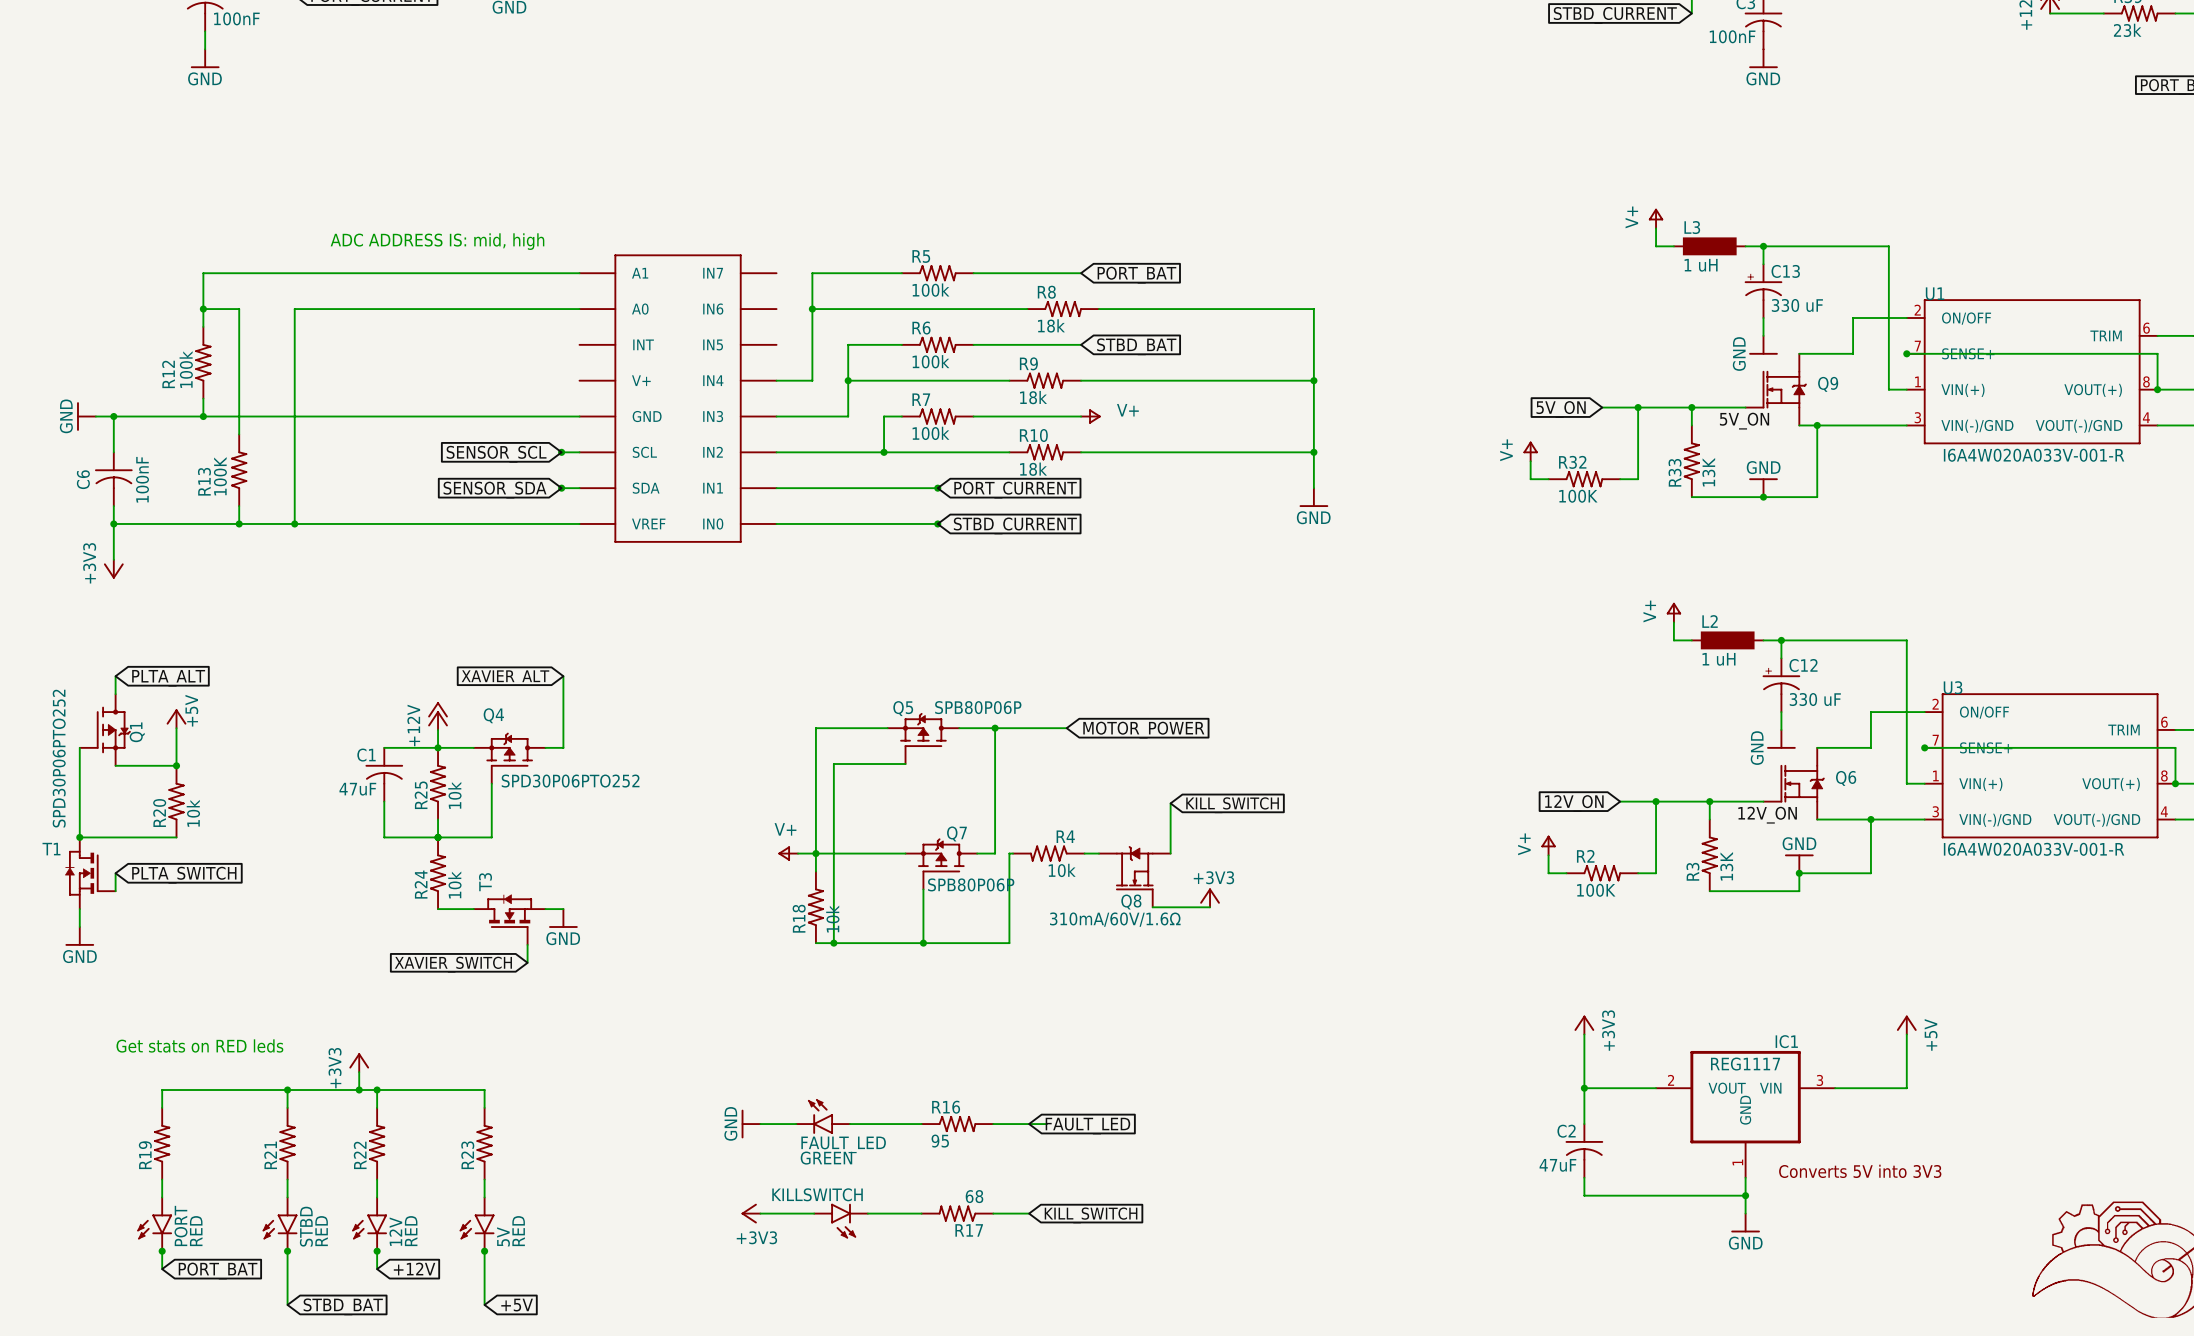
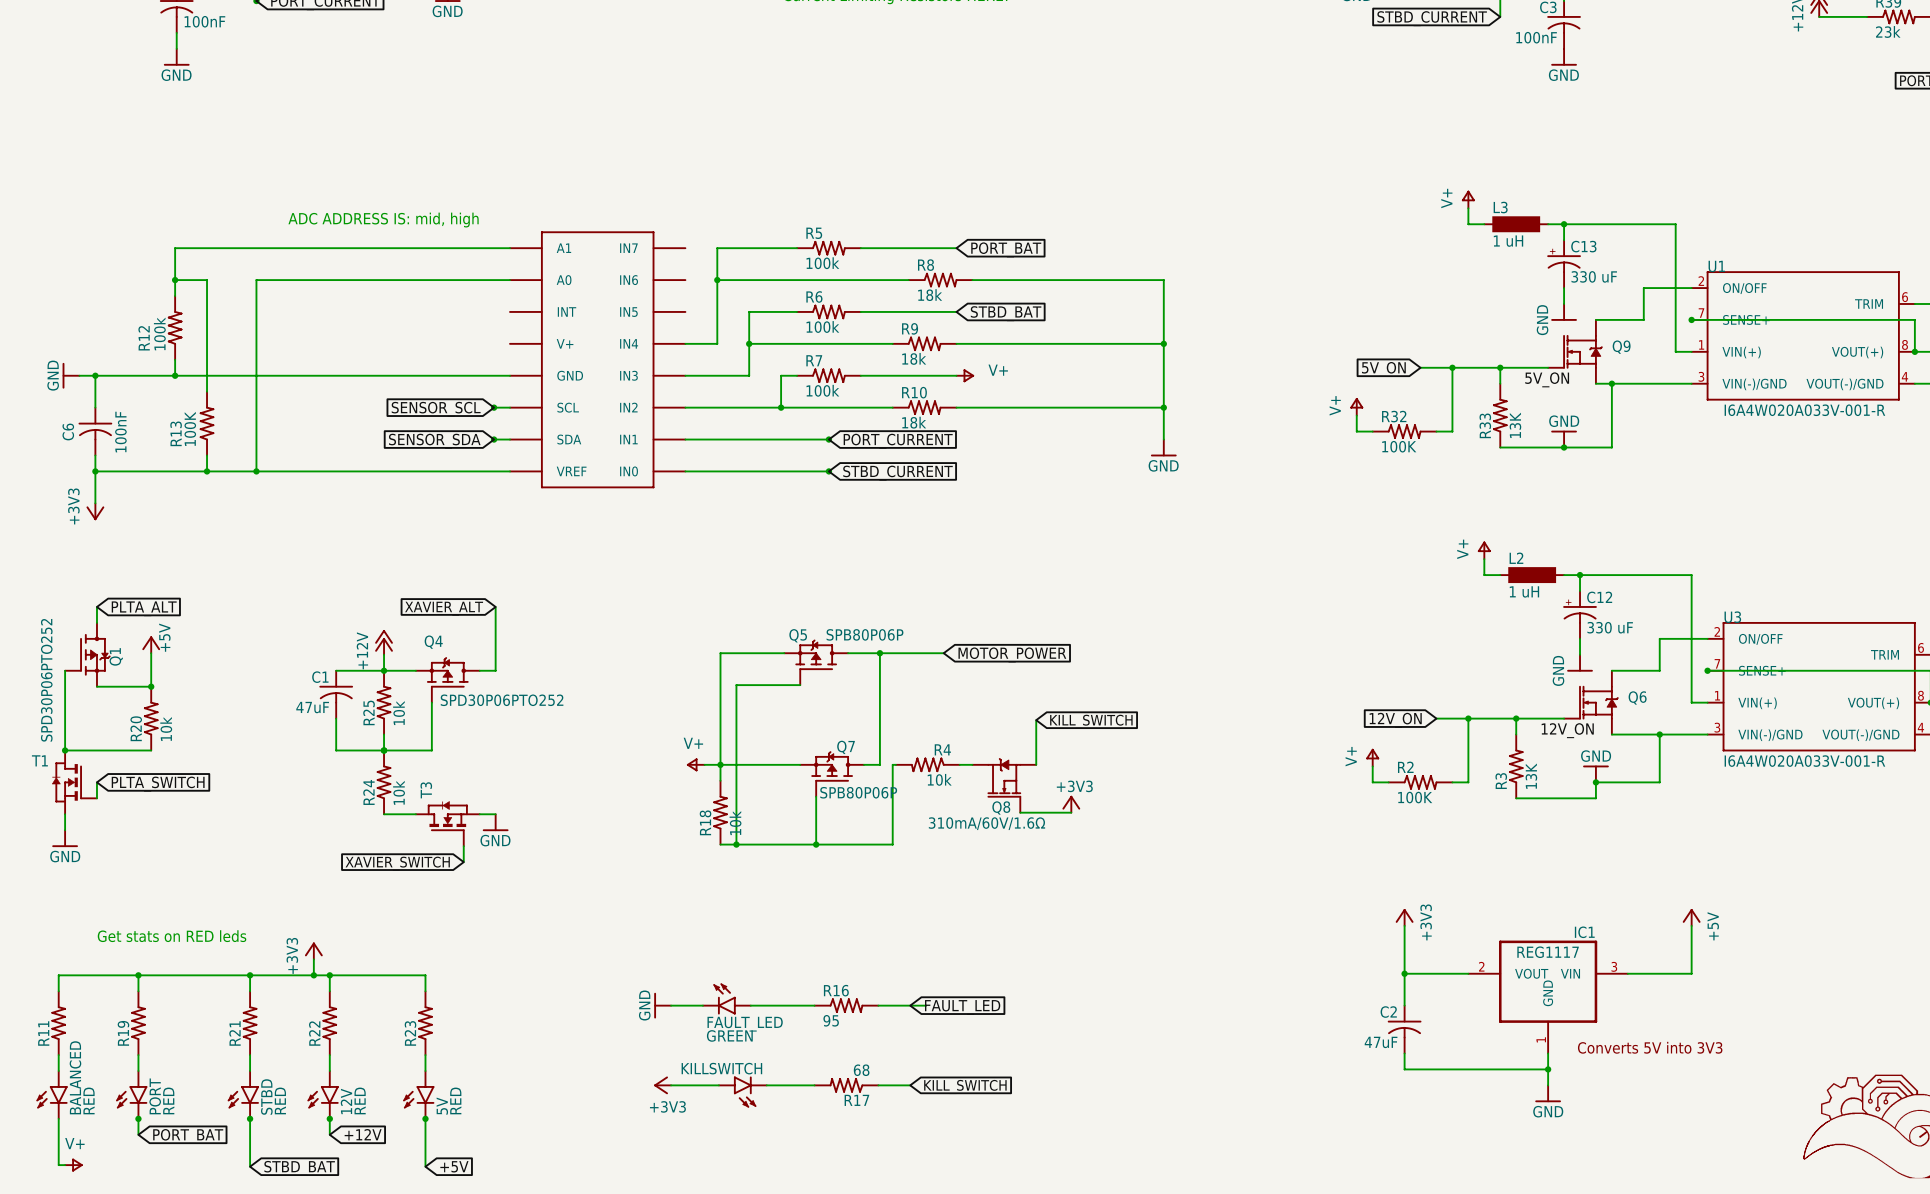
wire: none -> (138, 975) (58, 975) (58, 991)
junction: none -> (138, 975)
R11: none -> (58, 1023)
wire: none -> (58, 1055) (58, 1071)
BALANCED: none -> RED (52, 1094)
wire: none -> (58, 1118) (58, 1165) (65, 1165)
power symbol: none -> V+ (73, 1165)

